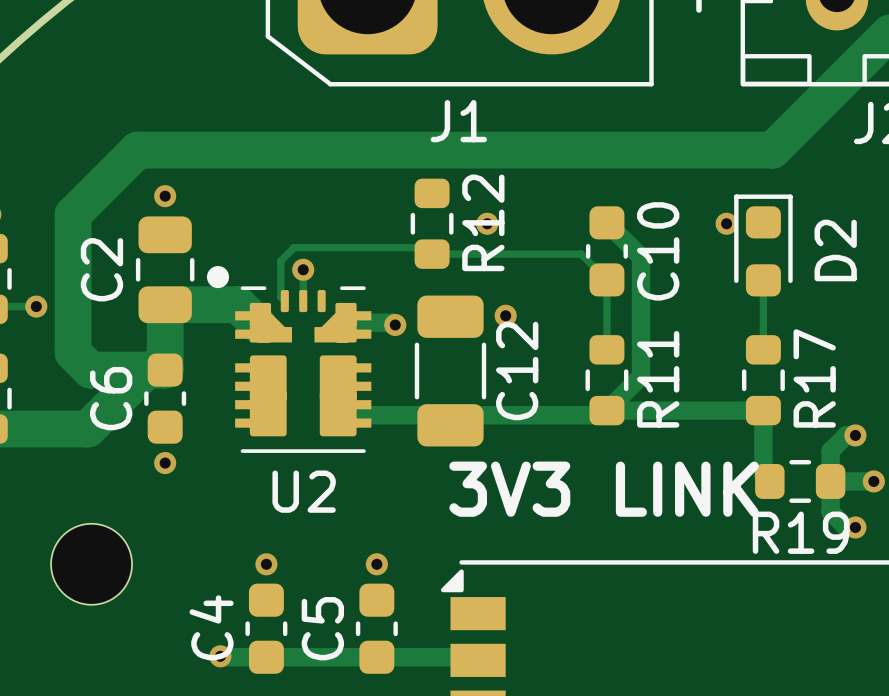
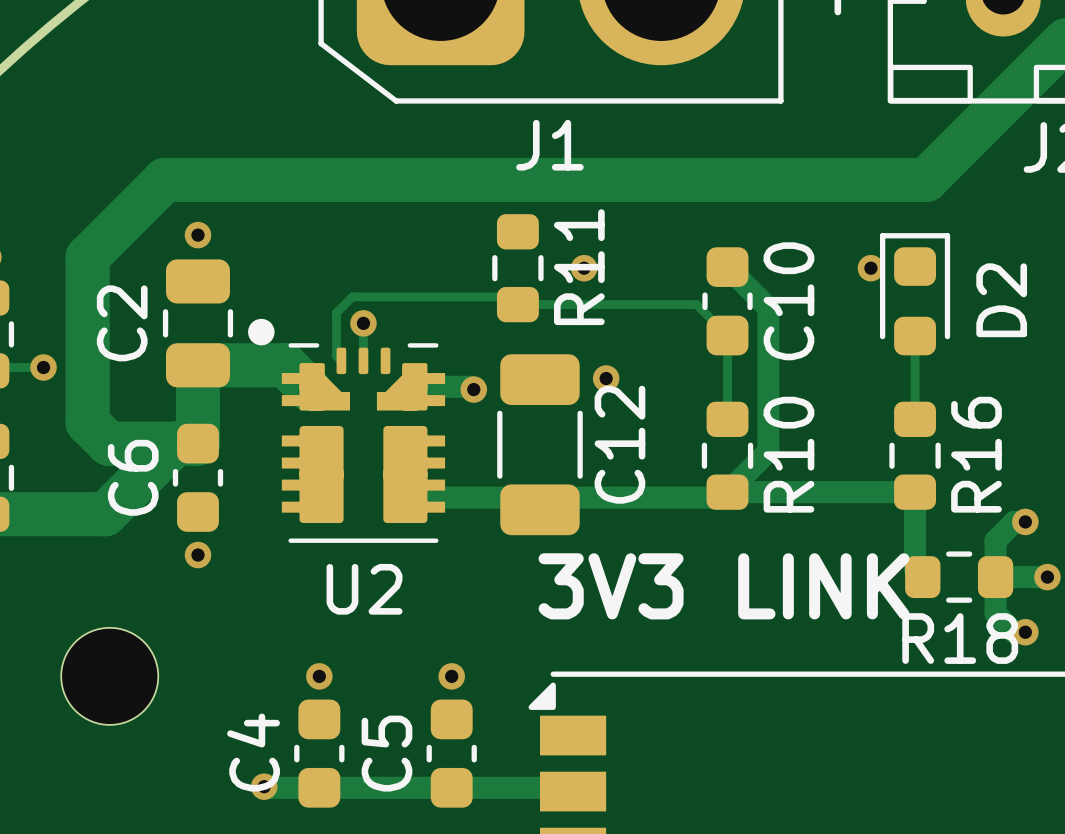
R12 name: R12 (483, 222) -> R11 (579, 267)
R17 name: R17 (814, 378) -> R16 (976, 454)
R11 name: R11 (658, 379) -> R10 (788, 454)
R19 name: R19 (801, 532) -> R18 (960, 638)

